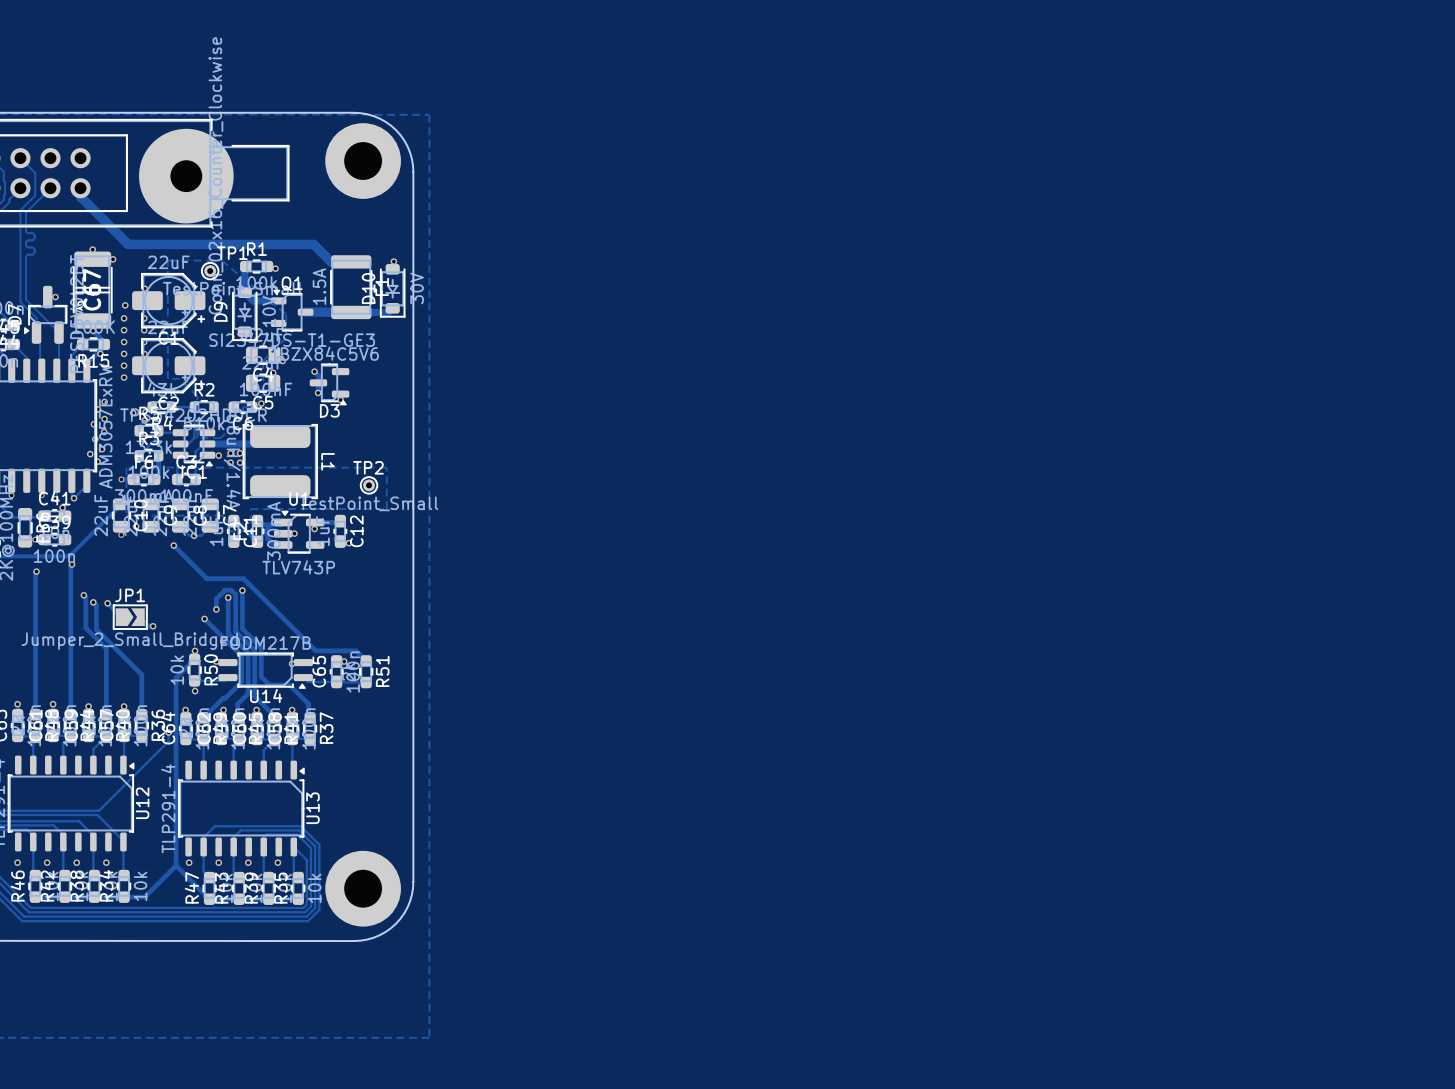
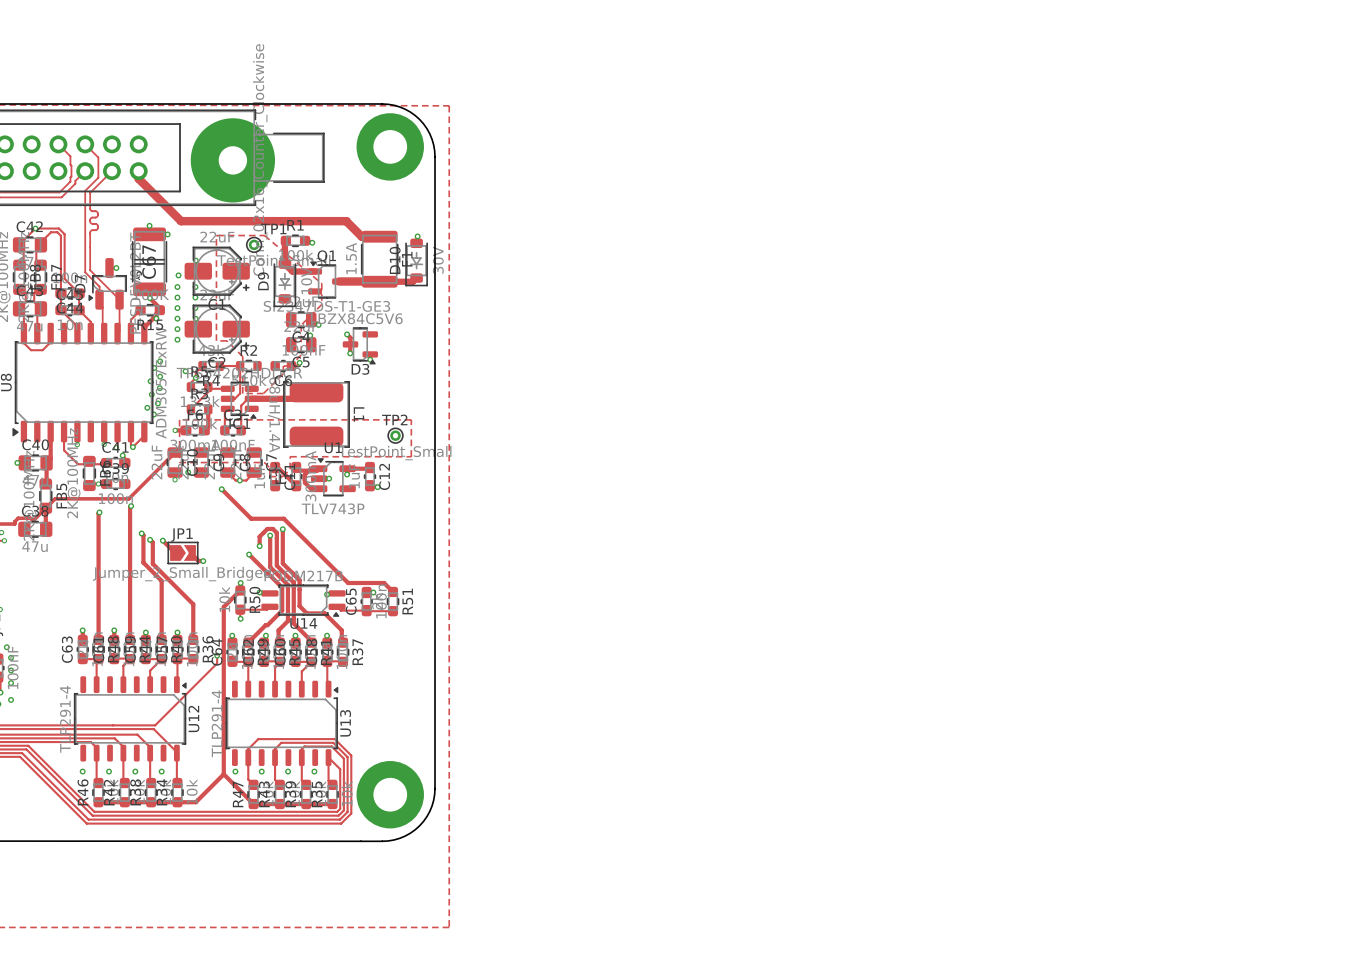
via: (230, 453) -> none
via: (240, 453) -> none
via: (218, 455) -> none
via: (230, 462) -> none
via: (240, 462) -> none

